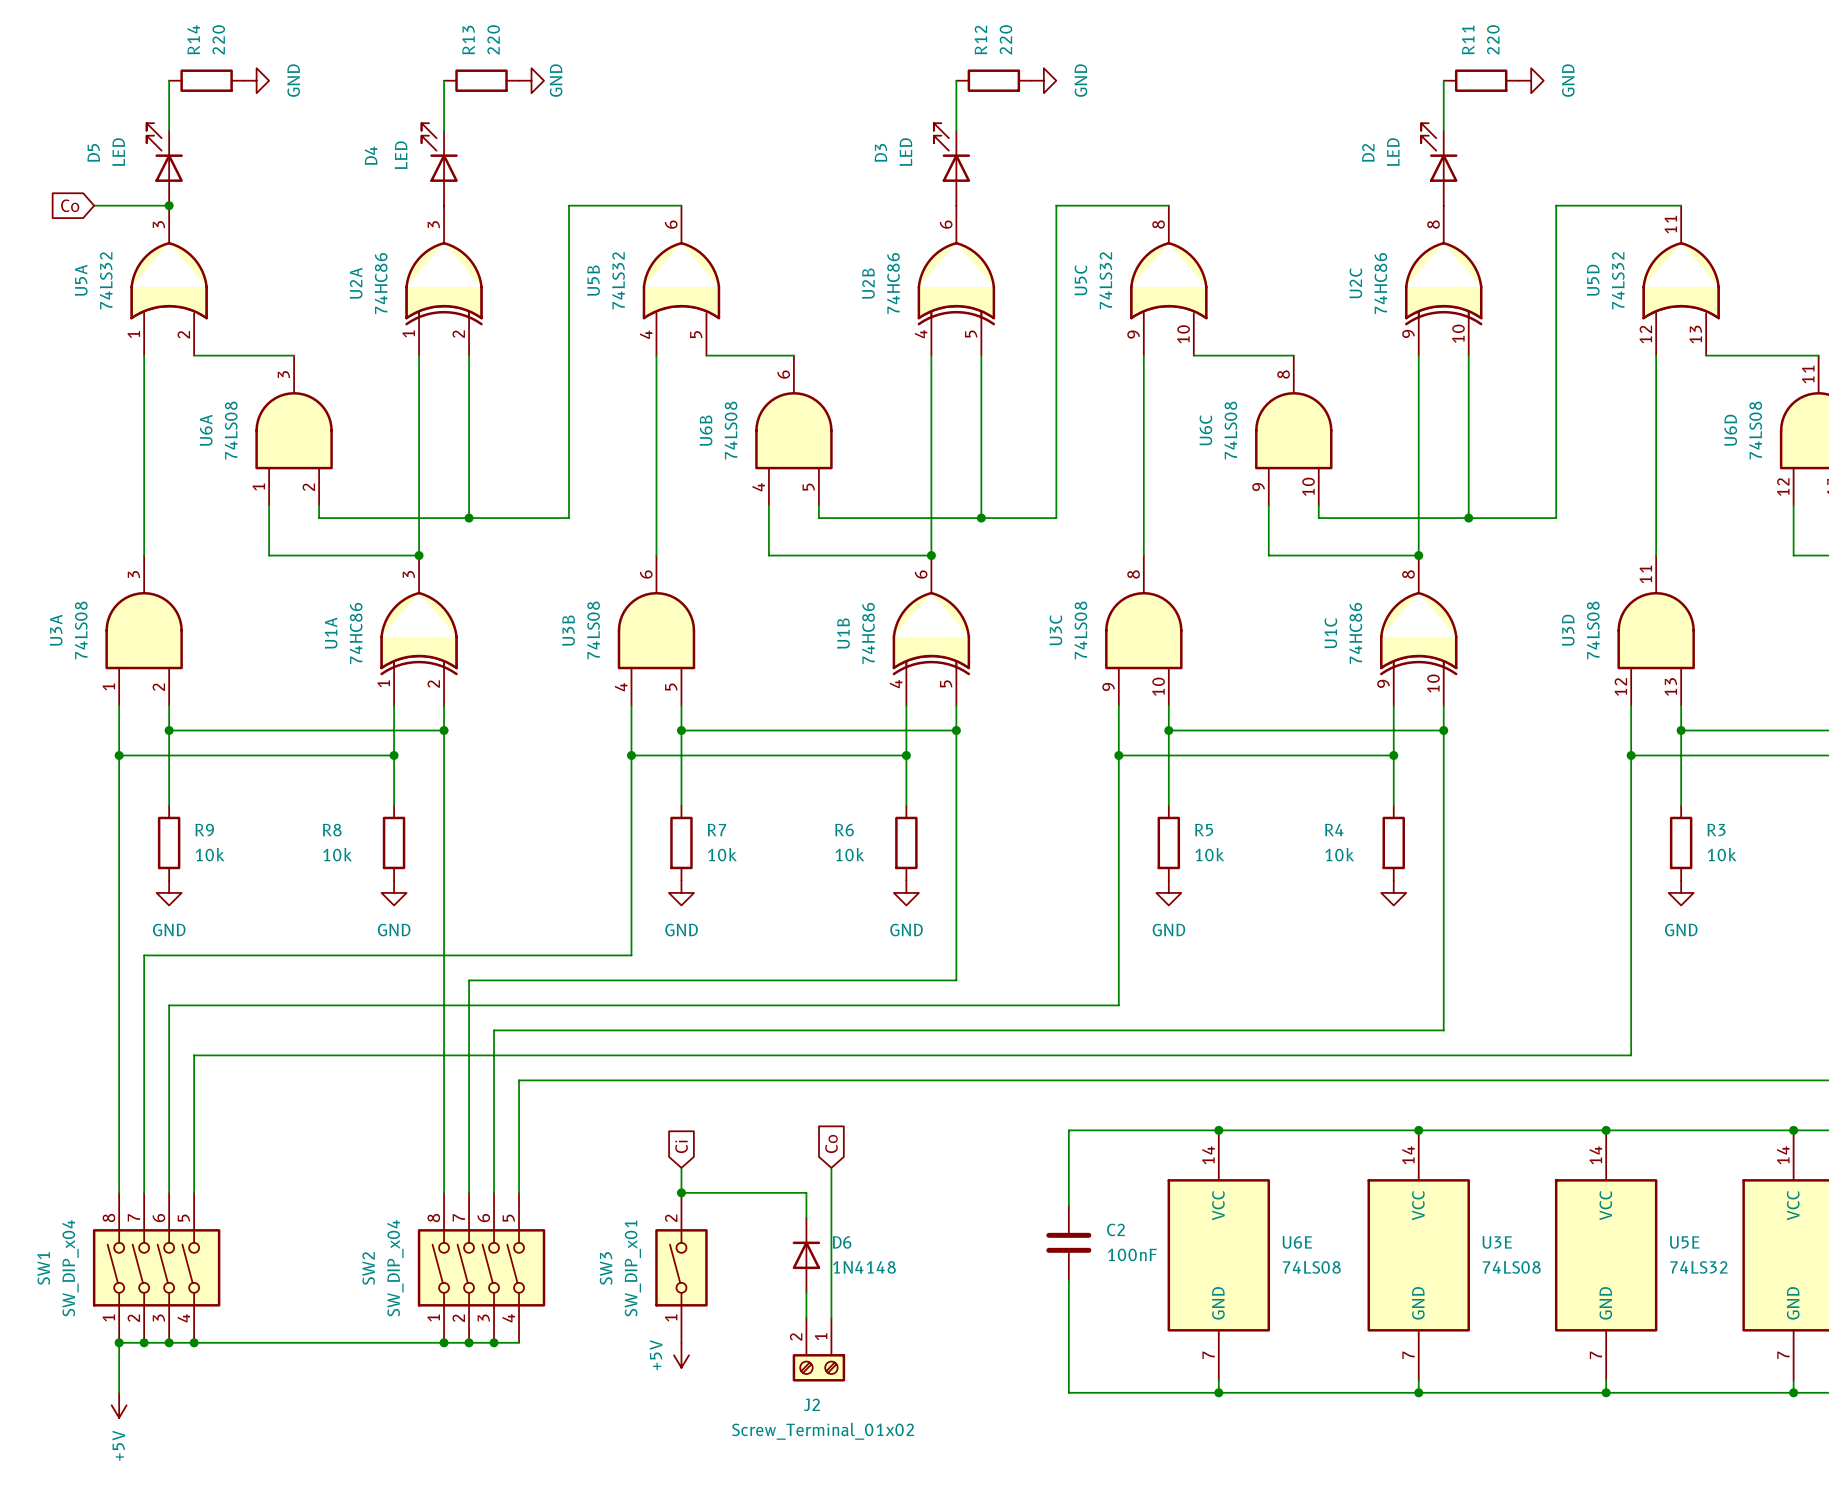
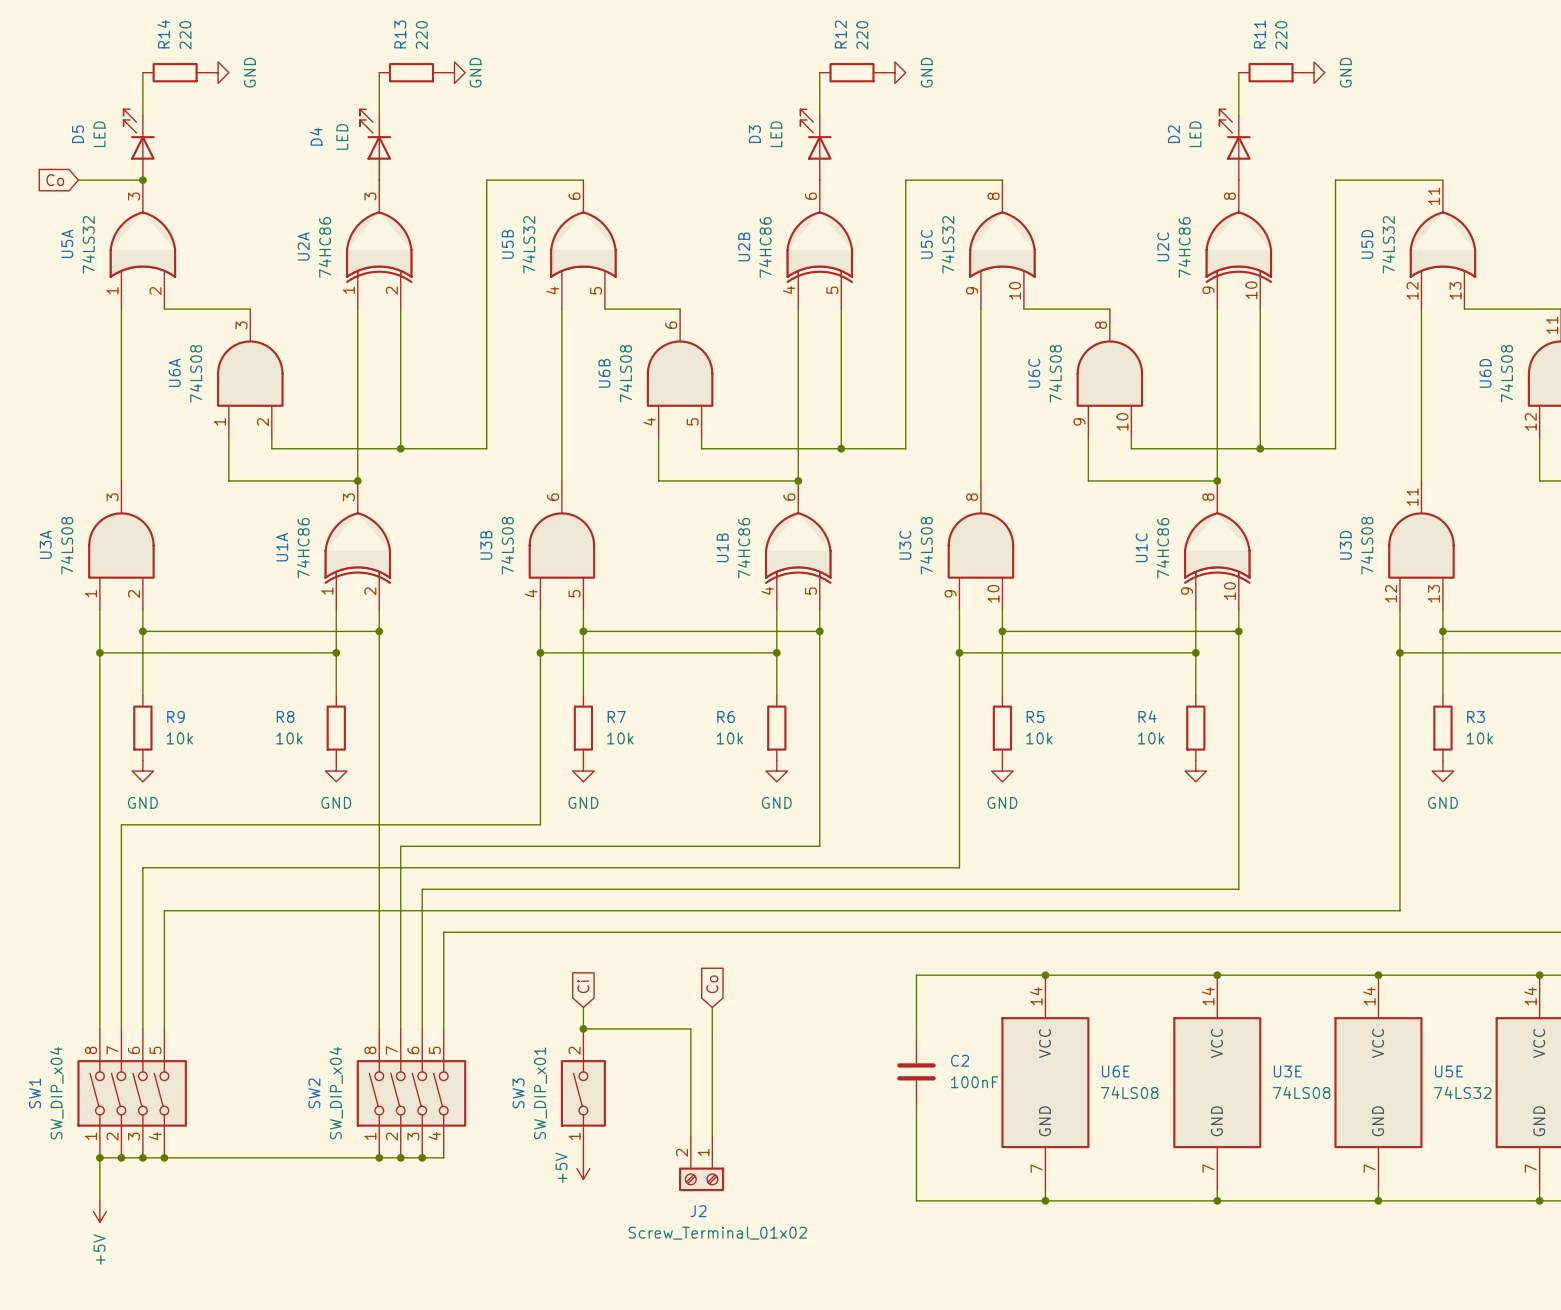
D6: 1N4148 (806, 1255) -> none

